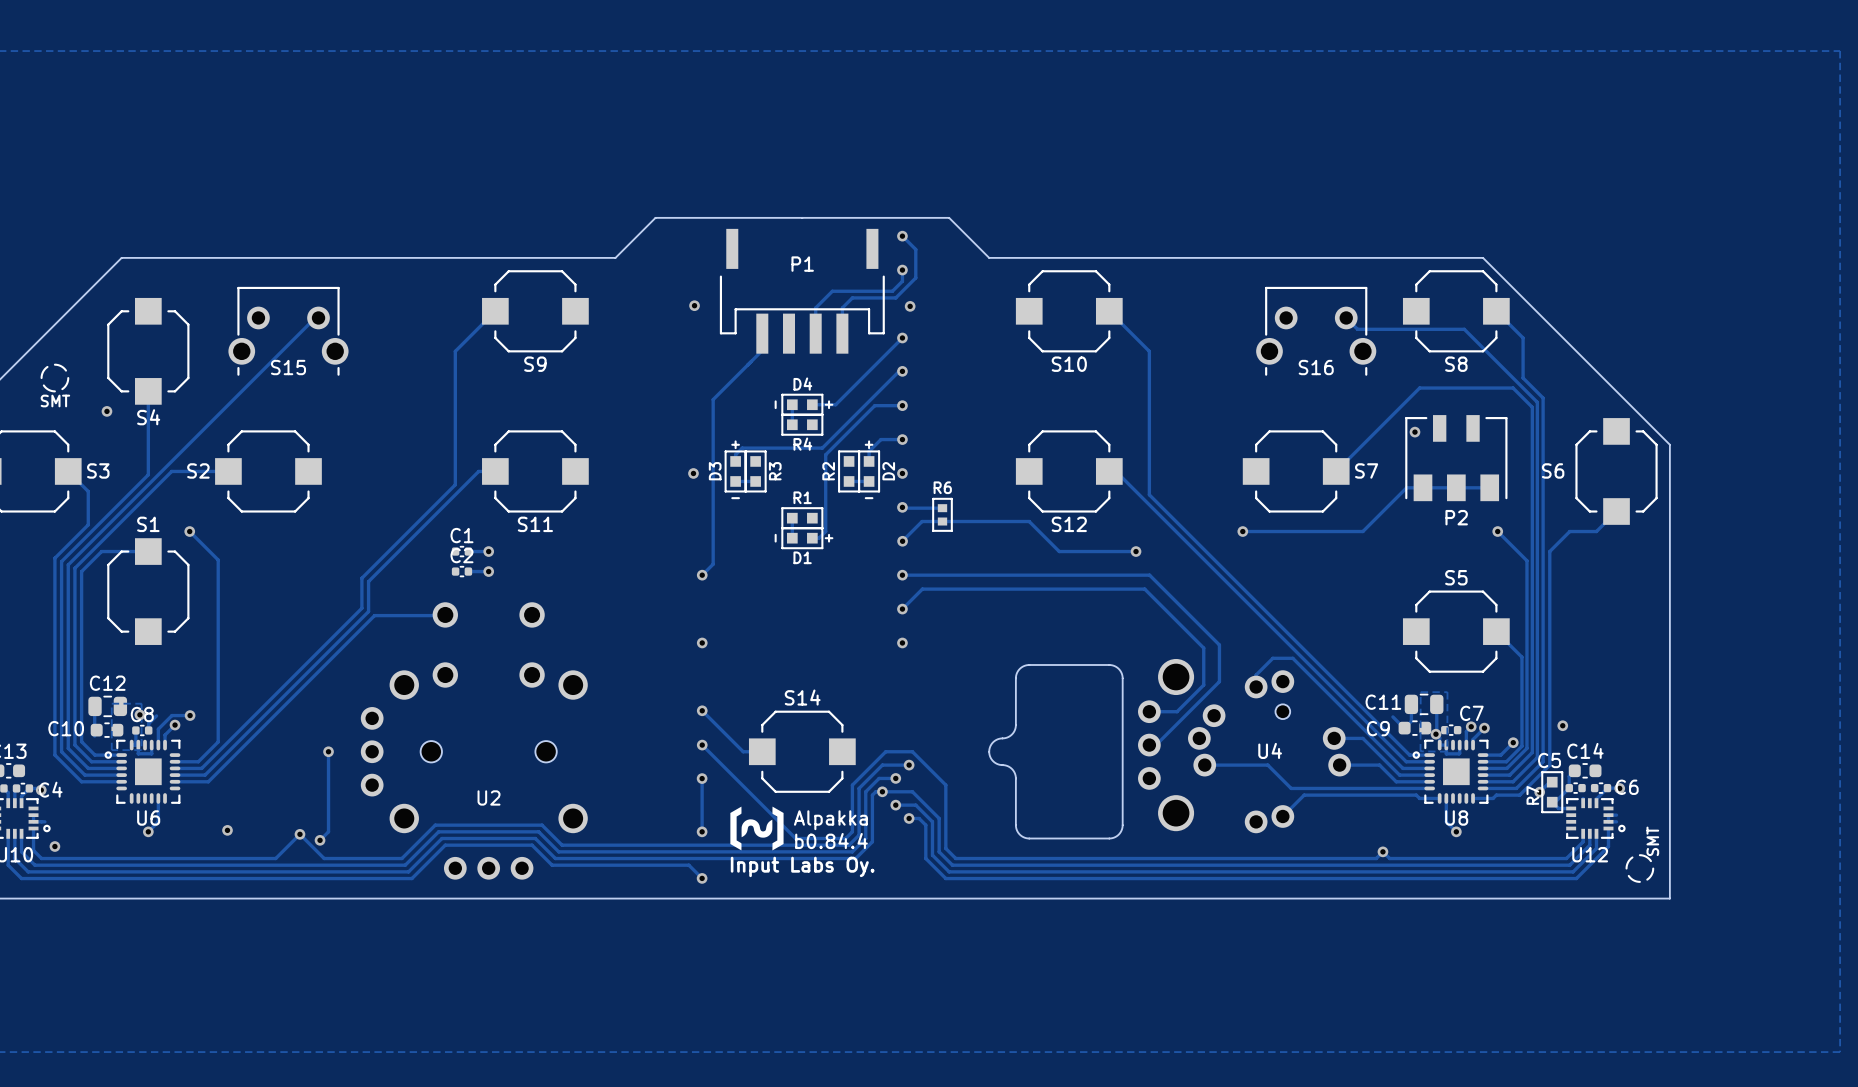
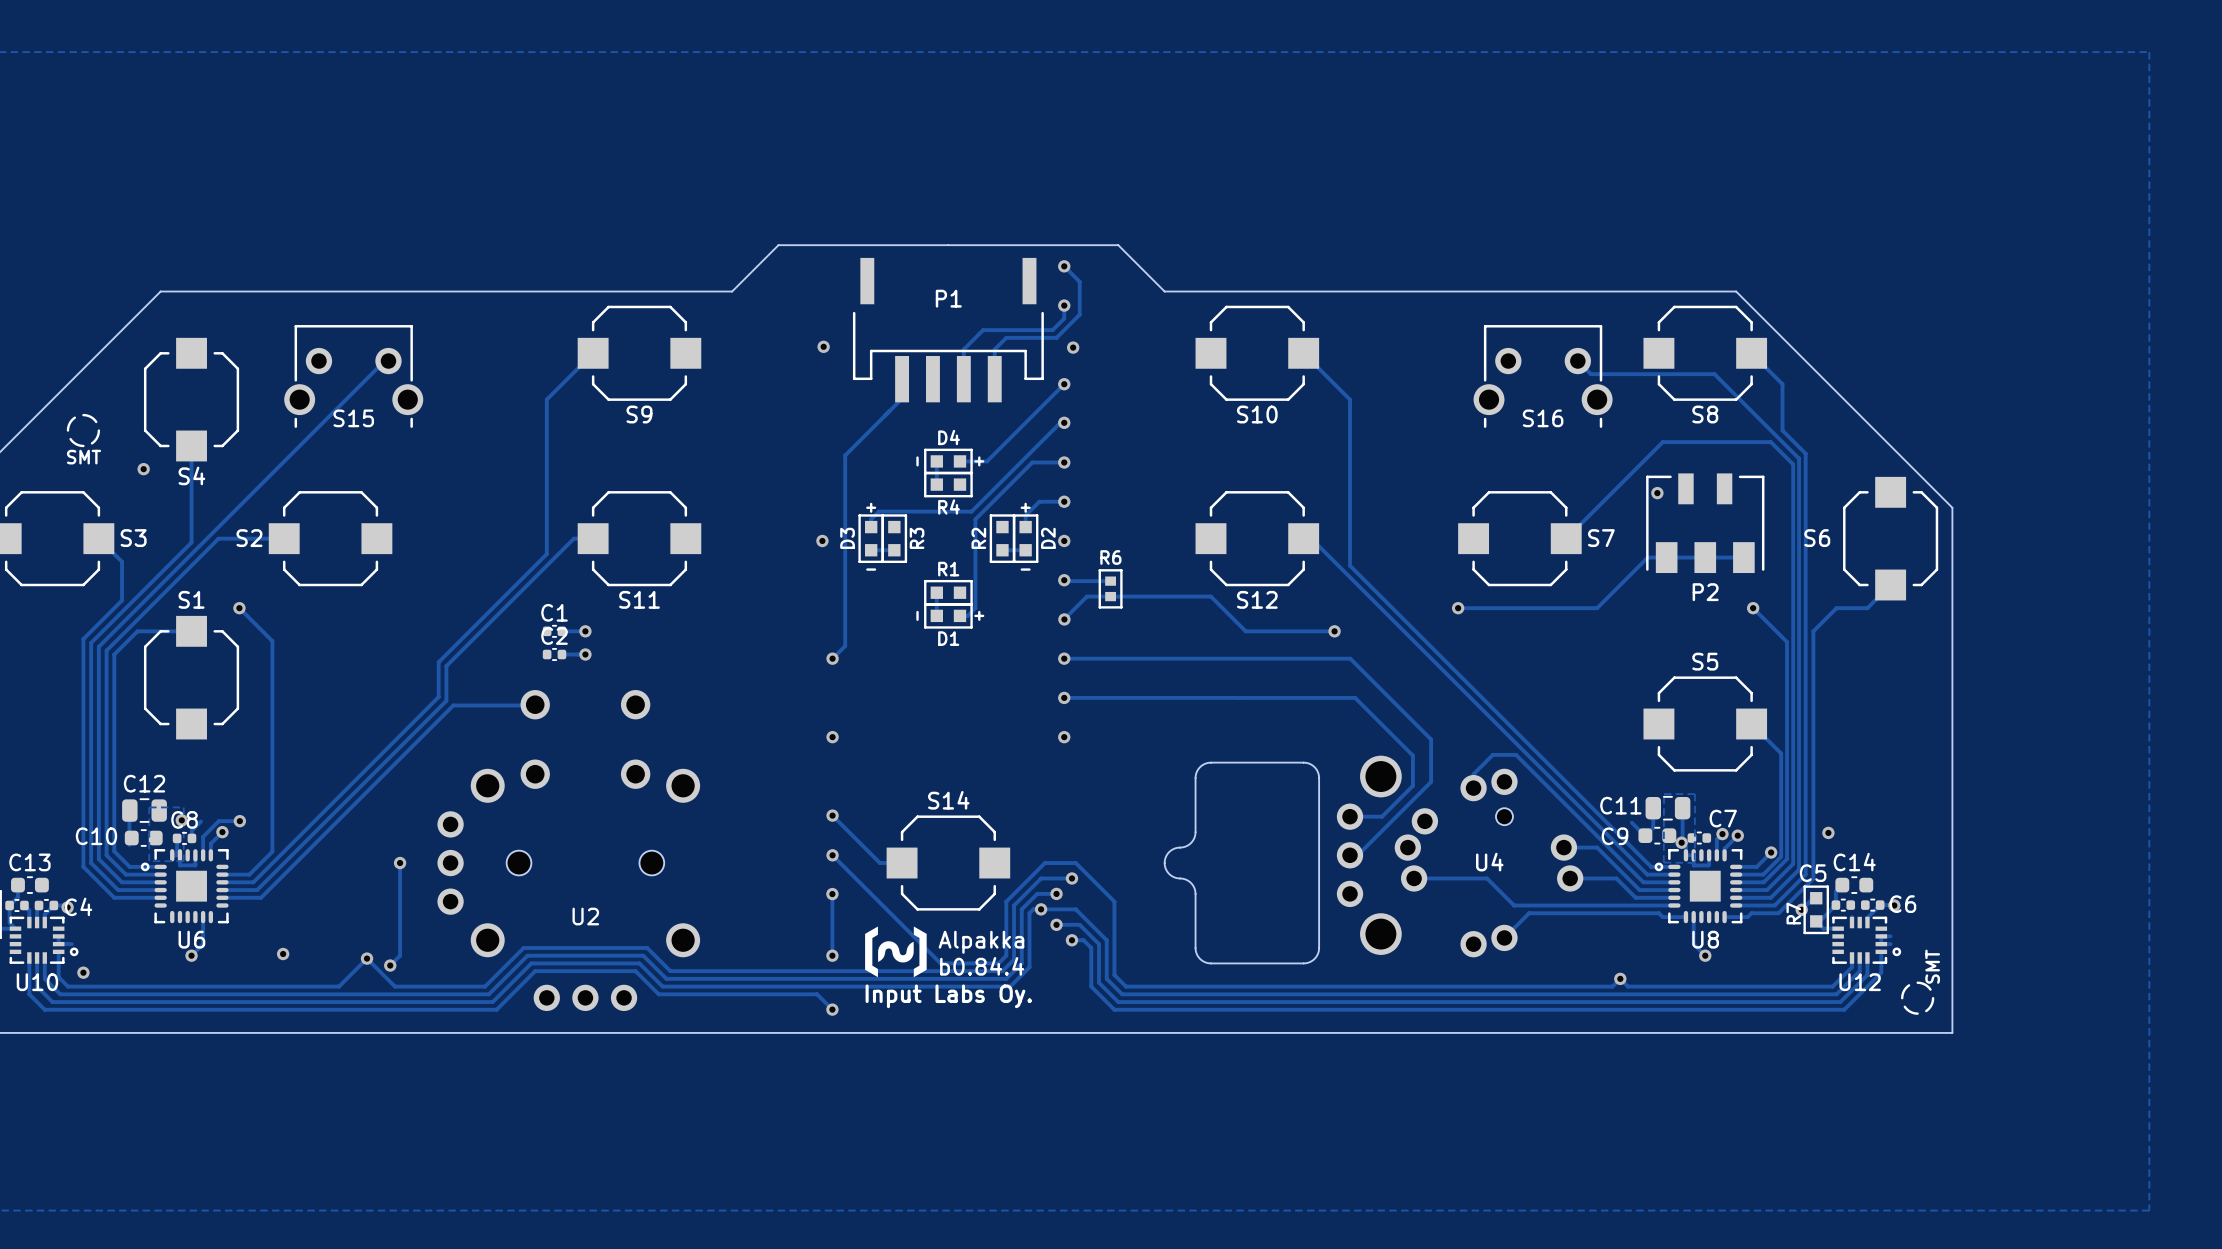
track: (902, 609) (922, 589) (1144, 589) (1203, 648) (1203, 658) -> (1239, 697) (1355, 697) (1412, 755)
track: none -> (1064, 697) (1239, 697)

